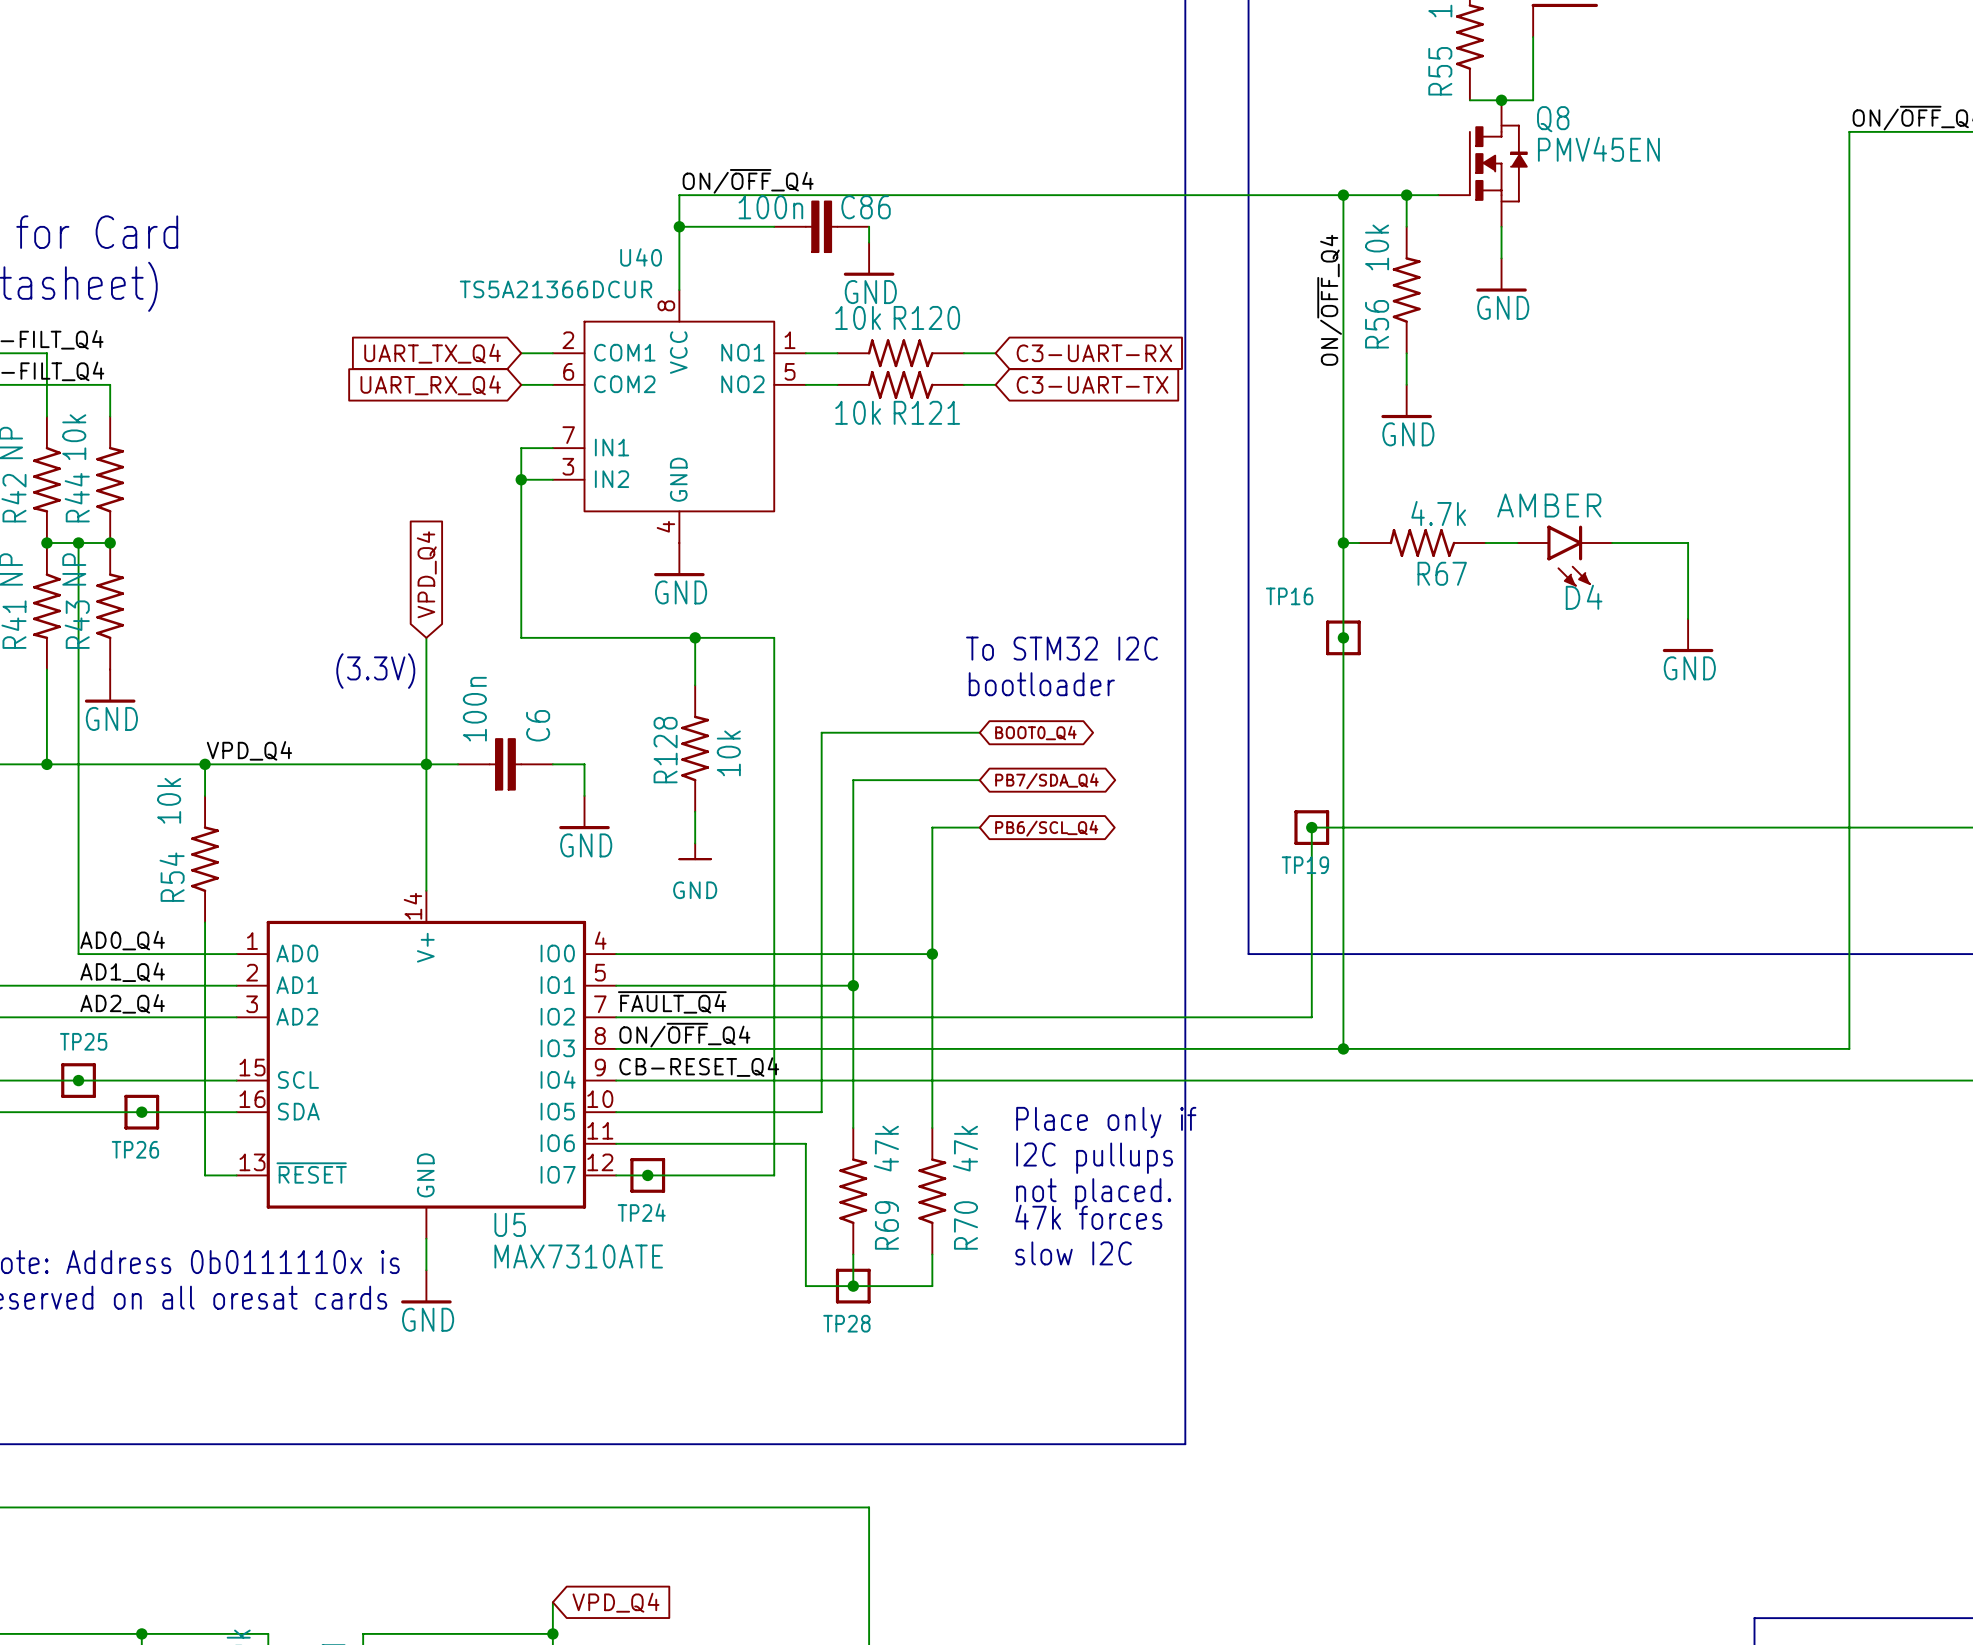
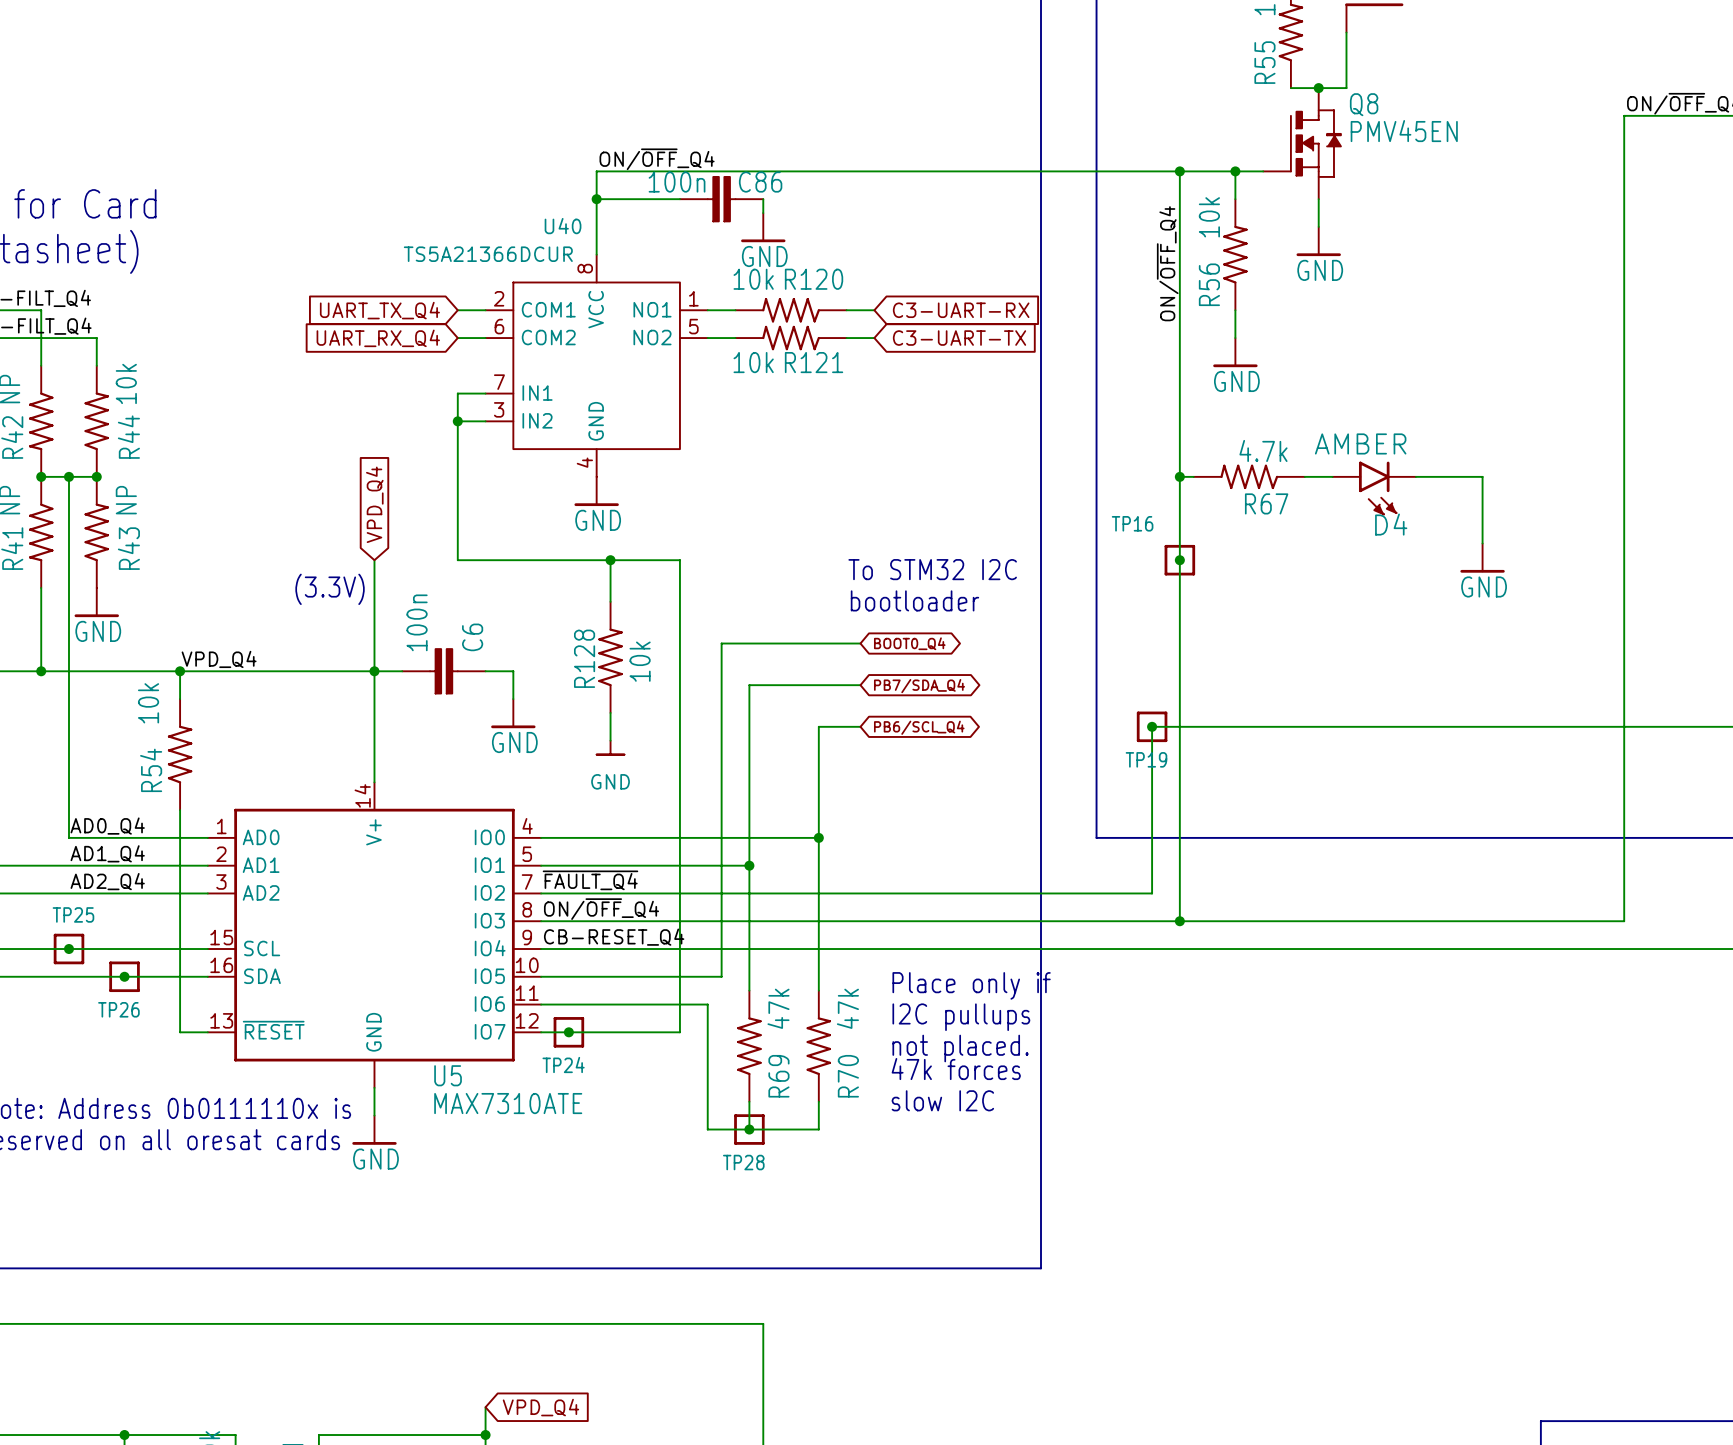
R44 value position: 10k (74, 437) -> 10k (126, 383)
R44 name position: R44 (77, 497) -> R44 (128, 437)
R43 value position: NP (74, 569) -> NP (126, 500)
R43 name position: R43 (77, 624) -> R43 (128, 548)

